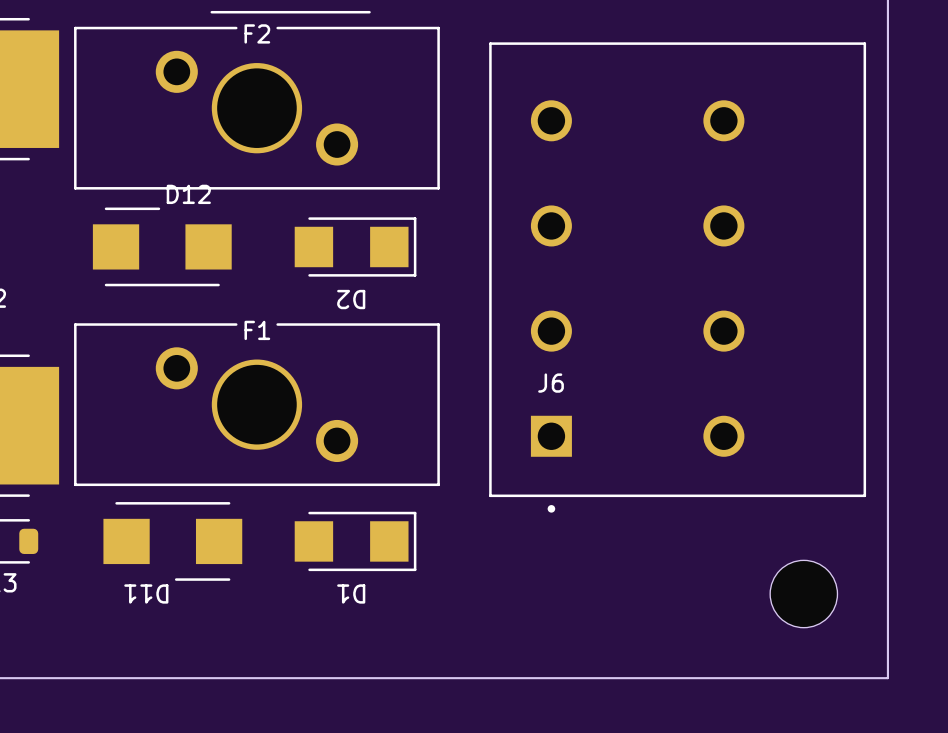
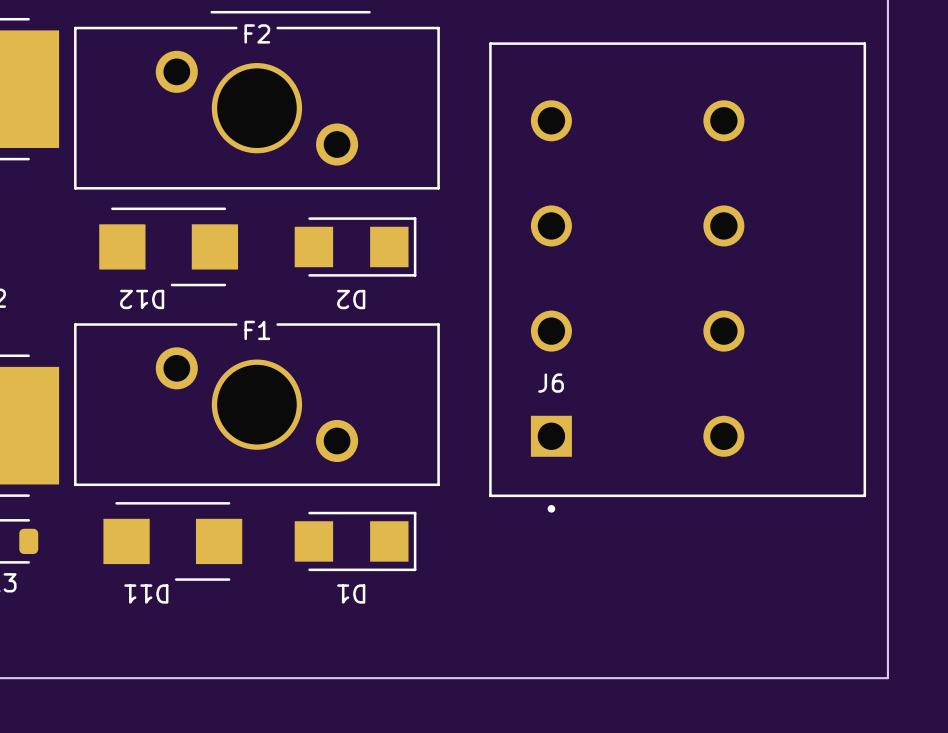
D12 rotation: 0° (162, 246) -> 180° (168, 246)
part: (803, 594) -> none

